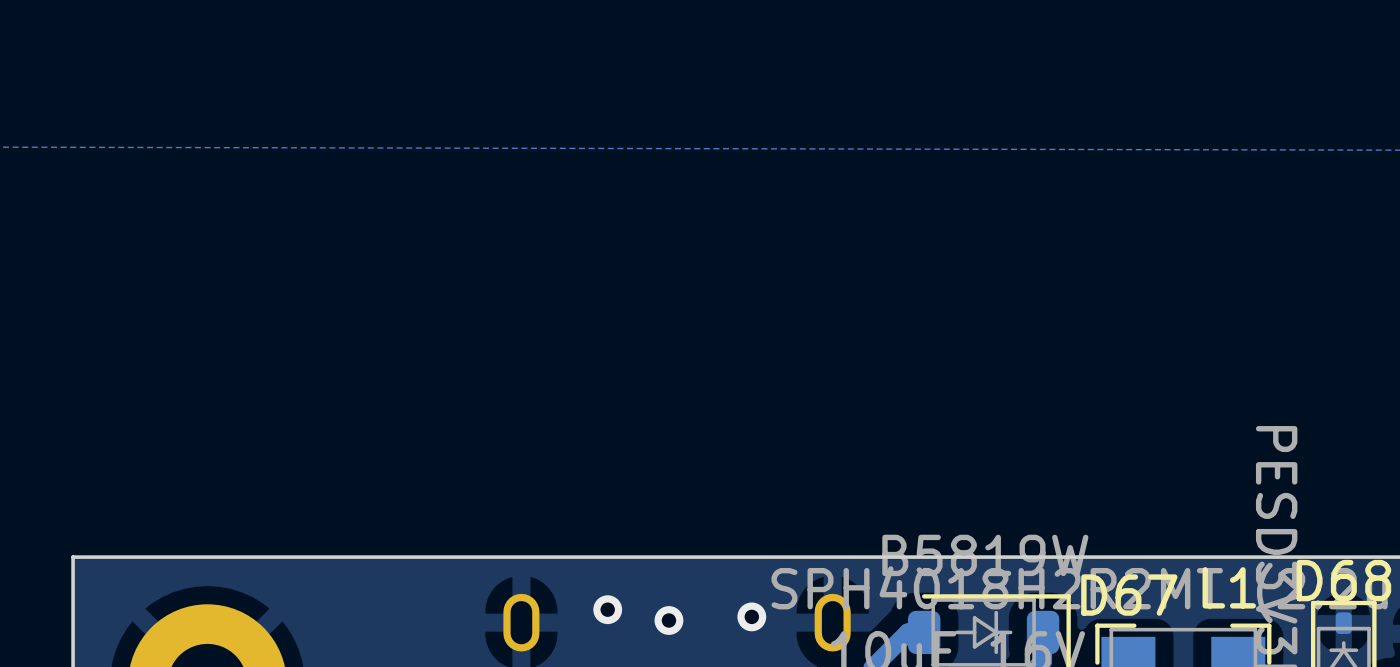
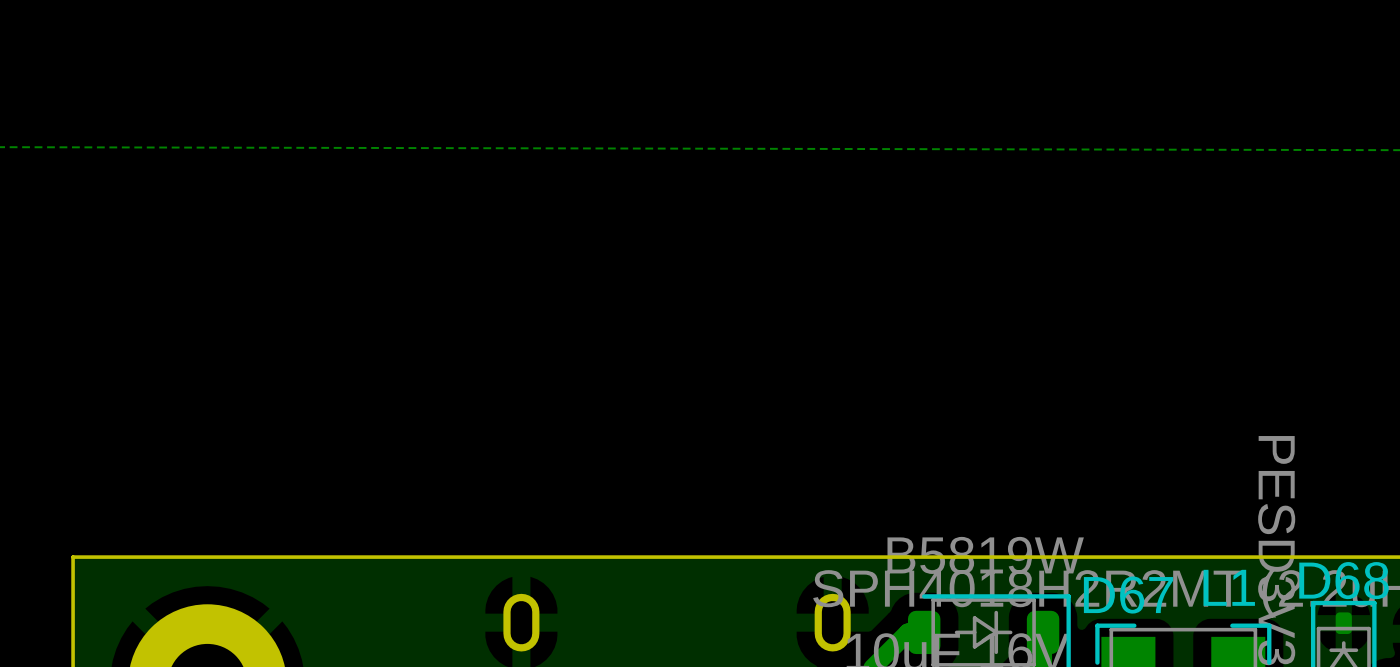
via: (607, 609) -> none
via: (751, 616) -> none
via: (668, 620) -> none

